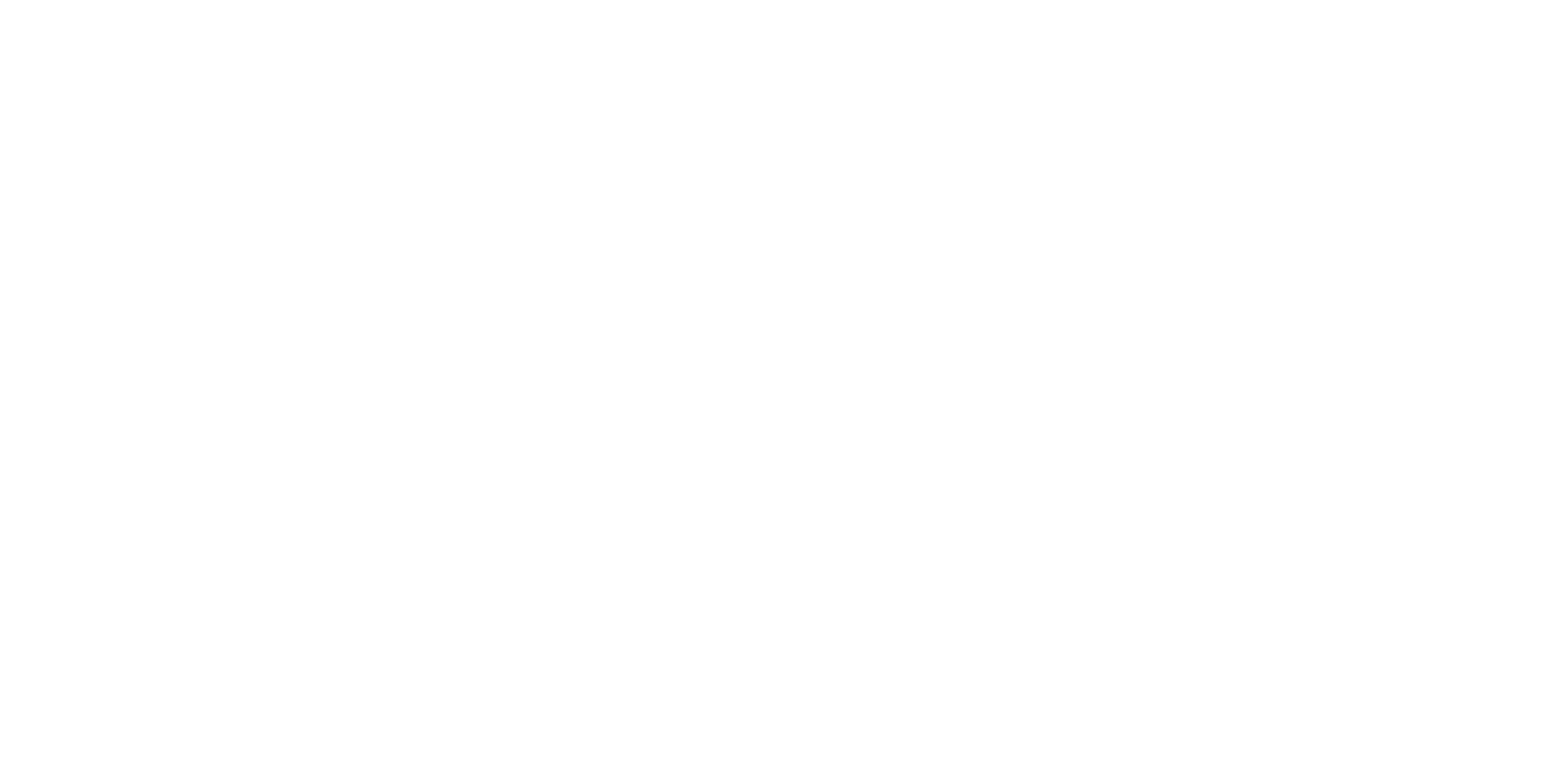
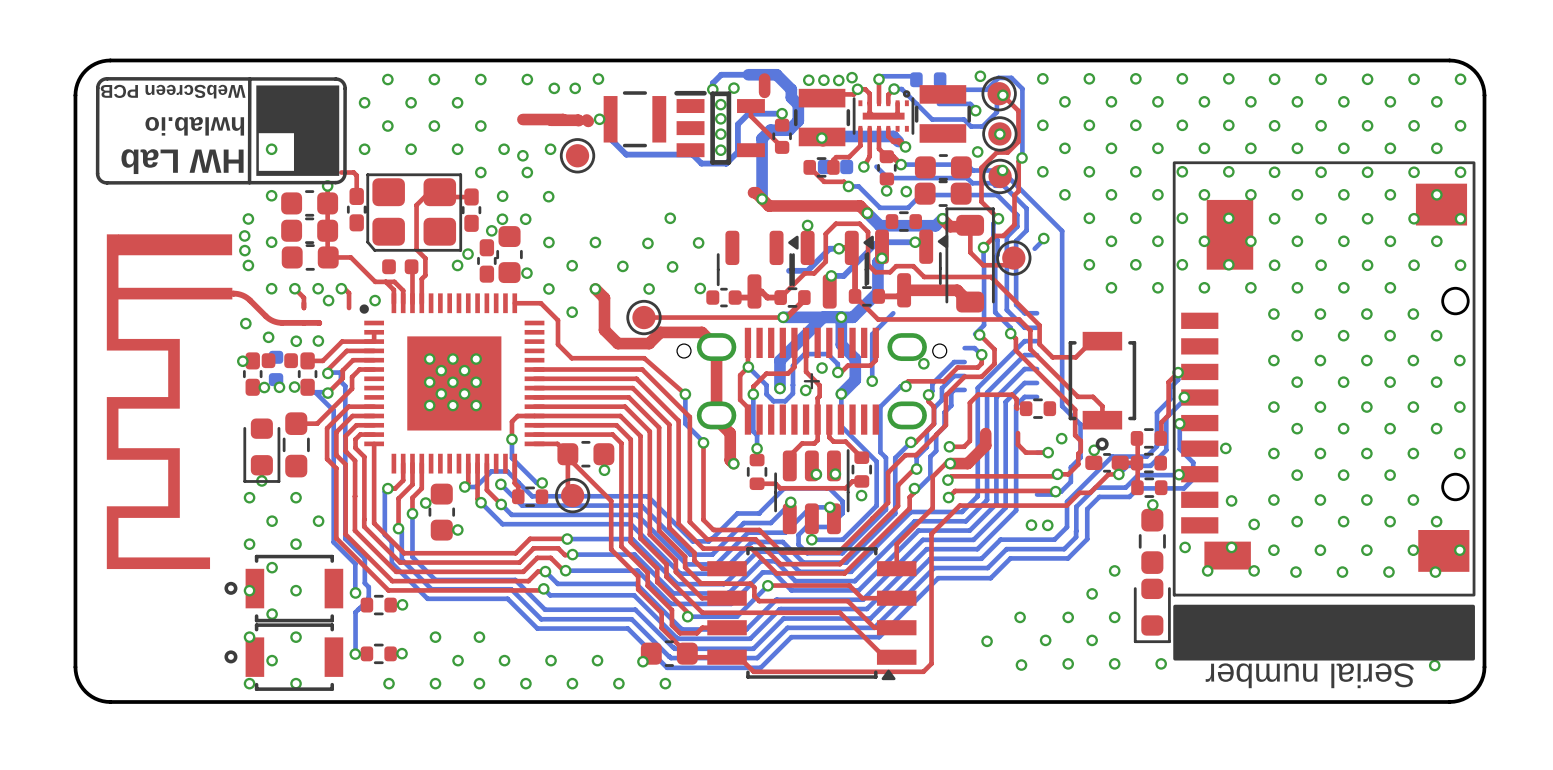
board edge: none -> (110, 60) (1449, 60) (1462, 63) (1470, 67) (1479, 77) (1484, 95) (1484, 667) (1481, 680) (1470, 694) (1458, 700) (1449, 702) (110, 702) (95, 698) (80, 685) (75, 667) (75, 95) (78, 80) (85, 70) (98, 62) (110, 60)
via: none -> (980, 76)
via: none -> (852, 77)
line: none -> (107, 78) (338, 79) (345, 87) (344, 177) (335, 182) (103, 182) (97, 174) (97, 88) (100, 81) (107, 78)
via: none -> (1042, 78)
via: none -> (1089, 78)
via: none -> (1135, 78)
via: none -> (1182, 78)
via: none -> (1228, 78)
line: none -> (249, 79) (249, 182)
via: none -> (387, 79)
via: none -> (434, 79)
via: none -> (480, 79)
via: none -> (527, 79)
via: none -> (598, 79)
top track: none -> (764, 79) (764, 92)
top track: none -> (878, 79) (878, 103)
bottom track: none -> (878, 79) (882, 76) (912, 76) (916, 79)
via: none -> (878, 79)
part: none -> (928, 79)
bottom track: none -> (940, 79) (940, 87) (942, 89) (986, 89) (998, 77) (1011, 77) (1022, 88) (1022, 157)
via: none -> (1274, 79)
via: none -> (1321, 79)
via: none -> (1367, 79)
via: none -> (1414, 79)
via: none -> (1460, 79)
via: none -> (808, 80)
via: none -> (823, 80)
via: none -> (838, 80)
drawing: none -> [256, 85, 340, 176]
via: none -> (554, 88)
via: none -> (575, 88)
via: none -> (733, 88)
bottom track: none -> (712, 89) (712, 83) (721, 74) (776, 74) (791, 89) (791, 97) (798, 104) (798, 120) (789, 130) (770, 130) (762, 138) (762, 199)
via: none -> (712, 89)
via: none -> (857, 89)
top track: none -> (894, 89) (888, 94) (888, 103)
bottom track: none -> (894, 89) (901, 89) (932, 119) (964, 119) (971, 126) (982, 126)
via: none -> (894, 89)
text: none -> WebScreen PCB (173, 91)
part: none -> (999, 93)
top track: none -> (822, 94) (853, 94) (857, 89) (865, 89) (869, 93) (869, 112) (873, 116)
top track: none -> (1002, 95) (1018, 110) (1018, 141) (1007, 152) (996, 152) (981, 167) (981, 201) (998, 218)
bottom track: none -> (1002, 95) (996, 103) (996, 112) (982, 126)
via: none -> (1002, 95)
via: none -> (1064, 101)
via: none -> (1111, 101)
via: none -> (1157, 101)
via: none -> (1204, 101)
via: none -> (1250, 101)
via: none -> (1297, 101)
via: none -> (1343, 101)
via: none -> (1390, 101)
via: none -> (1436, 101)
via: none -> (364, 102)
via: none -> (411, 102)
via: none -> (457, 102)
top track: none -> (897, 103) (897, 113) (894, 116)
bottom track: none -> (938, 103) (970, 103) (976, 110)
via: none -> (720, 104)
top track: none -> (753, 106) (750, 106) (750, 116) (782, 147)
via: none -> (975, 110)
part: none -> (883, 112)
bottom track: none -> (782, 113) (748, 113) (737, 124) (737, 152) (726, 163) (701, 163) (692, 154) (626, 154) (612, 140) (612, 126) (604, 119) (599, 119)
via: none -> (782, 113)
part: none -> (942, 113)
part: none -> (822, 117)
via: none -> (720, 118)
top track: none -> (522, 119) (563, 120)
top track: none -> (586, 119) (588, 121)
via: none -> (599, 119)
part: none -> (634, 119)
top track: none -> (551, 120) (578, 120)
text: none -> hwlab.io (194, 126)
via: none -> (1042, 125)
via: none -> (1089, 125)
via: none -> (1135, 125)
via: none -> (1182, 125)
via: none -> (1228, 125)
via: none -> (1274, 125)
via: none -> (1321, 125)
via: none -> (1367, 125)
via: none -> (1414, 125)
via: none -> (1460, 125)
via: none -> (387, 126)
via: none -> (434, 126)
via: none -> (480, 126)
part: none -> (719, 127)
top track: none -> (860, 128) (860, 145) (849, 157) (836, 157) (833, 159) (833, 167)
top track: none -> (869, 128) (869, 156) (863, 166)
top track: none -> (878, 128) (878, 148) (886, 156) (892, 156) (900, 164)
top track: none -> (888, 128) (888, 136) (893, 141)
part: none -> (999, 133)
via: none -> (720, 134)
via: none -> (999, 134)
part: none -> (782, 136)
bottom track: none -> (821, 138) (823, 136) (893, 136) (905, 146)
via: none -> (821, 138)
top track: none -> (893, 141) (898, 141) (904, 146) (905, 146) (899, 141) (893, 141)
via: none -> (905, 146)
via: none -> (1064, 148)
via: none -> (1111, 148)
via: none -> (1157, 148)
via: none -> (1204, 148)
via: none -> (1250, 148)
via: none -> (1297, 148)
via: none -> (1343, 148)
via: none -> (1390, 148)
via: none -> (1436, 148)
via: none -> (271, 149)
via: none -> (364, 149)
via: none -> (411, 149)
via: none -> (457, 149)
via: none -> (504, 149)
via: none -> (550, 149)
via: none -> (720, 150)
via: none -> (977, 151)
via: none -> (522, 155)
part: none -> (577, 155)
top track: none -> (1022, 157) (1018, 161) (1018, 191) (1014, 195) (1014, 224) (1003, 235) (994, 235) (983, 247)
via: none -> (1022, 157)
text: none -> HW Lab (182, 161)
bottom track: none -> (901, 164) (966, 164) (972, 170) (1002, 170) (1062, 231) (1062, 406) (1080, 424) (1080, 457) (1070, 467) (1070, 481) (1061, 491) (1055, 491)
via: none -> (901, 164)
part: none -> (835, 166)
via: none -> (863, 166)
bottom track: none -> (876, 166) (887, 178) (967, 178) (972, 183) (992, 183) (995, 185) (1003, 185) (1026, 208) (1026, 230) (1016, 240) (1016, 304) (1024, 313) (1037, 313)
top track: none -> (809, 167) (824, 181) (844, 181) (848, 186)
part: none -> (821, 167)
part: none -> (886, 167)
part: none -> (943, 167)
via: none -> (1002, 170)
via: none -> (1042, 171)
via: none -> (1089, 171)
via: none -> (1135, 171)
via: none -> (1182, 171)
via: none -> (1228, 171)
top track: none -> (341, 172) (353, 172) (356, 175) (356, 196)
via: none -> (480, 172)
via: none -> (527, 172)
via: none -> (1274, 172)
via: none -> (1321, 172)
via: none -> (1367, 172)
via: none -> (1414, 172)
via: none -> (1460, 172)
part: none -> (1000, 176)
top track: none -> (327, 185) (327, 256) (350, 257) (375, 281) (394, 281) (403, 290) (403, 303)
via: none -> (327, 185)
bottom track: none -> (848, 186) (858, 186) (880, 207) (908, 207) (920, 195) (997, 195) (1017, 215) (1017, 226) (1006, 237) (1006, 309) (1024, 327) (1037, 327)
via: none -> (848, 186)
via: none -> (886, 190)
via: none -> (906, 191)
top track: none -> (753, 192) (755, 192) (769, 205) (860, 205) (867, 213)
part: none -> (943, 193)
via: none -> (1064, 194)
via: none -> (1111, 194)
via: none -> (1157, 194)
via: none -> (1204, 194)
via: none -> (1250, 194)
via: none -> (1297, 194)
via: none -> (1343, 194)
via: none -> (1390, 194)
via: none -> (1436, 194)
via: none -> (271, 195)
via: none -> (502, 196)
via: none -> (548, 196)
top track: none -> (468, 197) (444, 197) (439, 192) (429, 192) (416, 205) (416, 249) (425, 258) (425, 275) (421, 278) (421, 303)
via: none -> (762, 199)
part: none -> (309, 203)
part: none -> (356, 209)
part: none -> (471, 210)
part: none -> (414, 212)
bottom track: none -> (867, 213) (879, 225) (935, 225) (942, 218)
via: none -> (867, 213)
via: none -> (670, 218)
via: none -> (942, 218)
bottom track: none -> (998, 218) (993, 223) (993, 236) (997, 240) (997, 254) (995, 257) (995, 312) (1010, 327) (1010, 333)
via: none -> (998, 218)
via: none -> (1089, 218)
via: none -> (1135, 218)
via: none -> (1182, 218)
via: none -> (1228, 218)
via: none -> (1274, 218)
via: none -> (1321, 218)
via: none -> (1367, 218)
via: none -> (1414, 218)
via: none -> (1460, 218)
via: none -> (248, 219)
via: none -> (502, 219)
via: none -> (525, 219)
top track: none -> (942, 219) (950, 226) (970, 226) (970, 252) (983, 265) (1006, 265) (1013, 258)
part: none -> (903, 221)
via: none -> (807, 225)
part: none -> (309, 230)
via: none -> (491, 230)
via: none -> (244, 235)
bottom track: none -> (1043, 238) (1034, 248)
via: none -> (1043, 238)
via: none -> (1111, 241)
via: none -> (1157, 241)
via: none -> (1204, 241)
via: none -> (1250, 241)
via: none -> (1297, 241)
via: none -> (1343, 241)
via: none -> (1390, 241)
via: none -> (1436, 241)
via: none -> (271, 242)
via: none -> (548, 242)
via: none -> (595, 242)
via: none -> (698, 242)
bottom track: none -> (915, 242) (875, 243) (843, 275) (831, 275)
via: none -> (915, 242)
via: none -> (647, 243)
bottom track: none -> (983, 247) (984, 325) (975, 334)
via: none -> (983, 247)
top track: none -> (839, 248) (851, 247) (855, 251) (855, 296) (878, 319) (1019, 319) (1030, 330) (1030, 349) (1078, 396) (1093, 396) (1102, 406) (1102, 420)
bottom track: none -> (839, 248) (829, 248) (807, 270) (789, 270)
via: none -> (839, 248)
via: none -> (244, 250)
via: none -> (468, 254)
part: none -> (509, 254)
part: none -> (310, 257)
bottom track: none -> (881, 258) (877, 262) (877, 292) (852, 317) (783, 317)
via: none -> (881, 258)
part: none -> (1013, 258)
part: none -> (970, 259)
part: none -> (486, 260)
via: none -> (1089, 264)
via: none -> (1135, 264)
via: none -> (1182, 264)
via: none -> (1228, 264)
via: none -> (248, 265)
via: none -> (457, 265)
via: none -> (572, 265)
via: none -> (1274, 265)
via: none -> (1321, 265)
via: none -> (1367, 265)
via: none -> (1414, 265)
via: none -> (1460, 265)
part: none -> (400, 266)
top track: none -> (411, 266) (412, 303)
via: none -> (622, 266)
via: none -> (672, 266)
part: none -> (907, 268)
part: none -> (757, 269)
part: none -> (832, 269)
via: none -> (526, 273)
via: none -> (831, 275)
top track: none -> (385, 281) (393, 290) (393, 303)
via: none -> (1111, 287)
via: none -> (1157, 287)
via: none -> (1204, 287)
via: none -> (1250, 287)
via: none -> (1297, 287)
via: none -> (1343, 287)
via: none -> (1390, 287)
via: none -> (271, 288)
top track: none -> (294, 288) (303, 297) (303, 308)
via: none -> (294, 288)
via: none -> (318, 288)
top track: none -> (341, 288) (344, 288) (349, 293) (349, 308)
via: none -> (341, 288)
via: none -> (548, 288)
top track: none -> (595, 288) (604, 298) (604, 330) (617, 343) (649, 343) (660, 332) (701, 332) (716, 347) (716, 419) (730, 433) (730, 460) (733, 463)
via: none -> (595, 288)
via: none -> (649, 288)
via: none -> (700, 288)
top track: none -> (171, 293) (238, 294) (248, 298) (267, 317) (275, 321) (319, 322)
part: none -> (866, 296)
top track: none -> (878, 296) (897, 296) (904, 290) (957, 290) (970, 303)
part: none -> (723, 297)
top track: none -> (737, 297) (755, 297) (761, 291) (767, 297) (782, 297)
top track: none -> (780, 297) (804, 273) (814, 273) (825, 261) (825, 233) (835, 223) (859, 223) (868, 232) (868, 264) (875, 272) (890, 272) (896, 266) (913, 266) (924, 276) (991, 276) (1039, 325) (1039, 344) (1052, 357) (1075, 357) (1091, 341) (1102, 341)
part: none -> (792, 297)
top track: none -> (806, 297) (786, 317) (782, 316)
via: none -> (328, 300)
via: none -> (375, 300)
top track: none -> (514, 303) (540, 303) (557, 320) (557, 344) (571, 358) (644, 358) (685, 394)
via: none -> (572, 312)
bottom track: none -> (893, 313) (872, 334) (872, 381)
via: none -> (1273, 314)
via: none -> (1320, 314)
via: none -> (1366, 314)
via: none -> (1413, 314)
top track: none -> (644, 317) (782, 317)
part: none -> (644, 317)
via: none -> (783, 317)
bottom track: none -> (823, 317) (779, 360) (779, 388)
bottom track: none -> (841, 317) (841, 344) (855, 358) (855, 380) (841, 394) (841, 426) (876, 461) (876, 505) (842, 539) (811, 539)
via: none -> (841, 317)
via: none -> (245, 323)
top track: none -> (374, 332) (374, 341) (342, 341) (322, 360) (307, 360)
top track: none -> (1010, 333) (1015, 338) (1015, 350) (1075, 409) (1075, 435) (1080, 440) (1078, 464) (1068, 474) (1057, 474) (1055, 476) (951, 476) (947, 480)
via: none -> (1010, 333)
via: none -> (979, 334)
top track: none -> (980, 334) (994, 349) (994, 363) (981, 376) (964, 376) (945, 395) (945, 425) (916, 455) (905, 455) (888, 472) (888, 502) (838, 552) (782, 552) (759, 530) (713, 530) (703, 520) (703, 442)
via: none -> (1297, 335)
via: none -> (1343, 335)
via: none -> (1390, 335)
via: none -> (1436, 335)
via: none -> (268, 337)
via: none -> (296, 341)
via: none -> (318, 341)
bottom track: none -> (1037, 341) (1024, 341) (977, 387) (977, 496) (962, 511) (910, 511) (851, 571) (799, 571) (779, 551) (757, 551) (723, 584) (677, 584) (632, 539) (567, 539)
top track: none -> (747, 342) (748, 367) (740, 375) (740, 399) (747, 407) (747, 419)
top track: none -> (794, 342) (794, 367) (787, 373) (766, 373) (753, 386) (753, 394)
top track: none -> (806, 342) (806, 371) (819, 385) (819, 396) (817, 398) (817, 440) (814, 443) (802, 443) (788, 456) (788, 465)
top track: none -> (875, 342) (875, 360) (870, 365) (847, 365) (841, 372) (837, 372)
bottom track: none -> (964, 348) (974, 348) (981, 355)
top track: none -> (374, 350) (346, 350) (327, 369) (327, 373) (329, 370)
top track: none -> (981, 354) (981, 363) (977, 367) (957, 367) (943, 381) (908, 381) (905, 386)
via: none -> (981, 354)
bottom track: none -> (1037, 355) (1024, 355) (987, 392) (987, 500) (965, 521) (914, 521) (854, 581) (795, 581) (775, 561) (760, 561) (727, 593) (673, 593) (634, 554) (572, 554)
via: none -> (429, 359)
via: none -> (452, 359)
via: none -> (476, 359)
part: none -> (279, 360)
top track: none -> (374, 360) (353, 360) (342, 370) (342, 378) (327, 393)
via: none -> (1273, 360)
via: none -> (1320, 360)
via: none -> (1366, 360)
via: none -> (1413, 360)
via: none -> (1459, 360)
via: none -> (242, 361)
bottom track: none -> (964, 362) (954, 362) (932, 383) (932, 391) (928, 394)
via: none -> (923, 363)
bottom track: none -> (748, 367) (766, 385) (766, 394) (773, 401) (785, 401) (792, 393) (792, 365) (804, 354) (827, 354) (837, 364) (837, 372)
via: none -> (748, 367)
part: none -> (276, 368)
via: none -> (822, 368)
top track: none -> (374, 369) (359, 369) (352, 377) (352, 388) (317, 423) (296, 423)
top track: none -> (534, 369) (642, 369) (689, 417) (689, 521) (707, 539) (755, 539) (780, 564) (839, 564) (898, 506) (898, 485) (914, 469) (916, 469)
bottom track: none -> (1037, 369) (1024, 369) (996, 397) (996, 503) (969, 530) (918, 530) (858, 590) (791, 590) (773, 572) (762, 572) (731, 603) (670, 603) (637, 570) (565, 570)
via: none -> (441, 370)
via: none -> (464, 370)
via: none -> (837, 372)
top track: none -> (1178, 372) (1168, 382) (1168, 415) (1161, 422) (1161, 438)
bottom track: none -> (1178, 372) (1178, 379) (1170, 387) (1170, 399) (1156, 412) (1156, 446) (1146, 456) (1112, 456) (1067, 501) (1067, 527) (1054, 539) (1000, 539) (981, 558) (930, 558) (870, 618) (783, 618) (753, 648) (673, 647)
via: none -> (1178, 372)
bottom track: none -> (327, 373) (340, 372) (340, 381) (345, 386) (345, 538) (364, 558) (364, 583) (368, 587) (368, 599) (359, 609)
via: none -> (327, 373)
part: none -> (252, 374)
part: none -> (307, 374)
bottom track: none -> (964, 376) (954, 376) (941, 388) (941, 400) (934, 408) (934, 423) (926, 431) (926, 447) (916, 457) (916, 469)
top track: none -> (534, 378) (636, 378) (678, 420) (678, 523) (703, 548) (751, 548) (776, 573) (844, 573) (909, 508) (909, 497) (914, 492) (914, 488)
part: none -> (1324, 378)
part: none -> (811, 381)
via: none -> (872, 381)
via: none -> (429, 382)
via: none -> (452, 382)
via: none -> (476, 382)
bottom track: none -> (1037, 382) (1024, 382) (1005, 401) (1005, 507) (973, 539) (922, 539) (863, 599) (777, 599)
via: none -> (1297, 382)
via: none -> (1343, 382)
via: none -> (1390, 382)
via: none -> (1436, 382)
part: none -> (452, 383)
bottom track: none -> (905, 386) (900, 386) (880, 406) (880, 452) (885, 457) (885, 509) (842, 553) (807, 553) (798, 544) (798, 534) (806, 526) (829, 526) (842, 513) (842, 502)
via: none -> (905, 386)
via: none -> (264, 387)
via: none -> (279, 387)
via: none -> (294, 387)
top track: none -> (534, 388) (632, 388) (669, 424) (669, 527) (694, 552) (694, 560) (702, 568) (727, 568)
via: none -> (779, 388)
bottom track: none -> (964, 389) (954, 389) (951, 392) (951, 405) (944, 412) (944, 426) (936, 434) (936, 450) (930, 456) (930, 476) (917, 489)
via: none -> (805, 390)
part: none -> (1102, 391)
bottom track: none -> (327, 393) (315, 392) (333, 410) (333, 542) (355, 563) (355, 592)
via: none -> (327, 393)
via: none -> (441, 393)
via: none -> (464, 393)
bottom track: none -> (685, 394) (685, 423) (703, 441)
via: none -> (685, 394)
bottom track: none -> (753, 394) (753, 431) (757, 435) (757, 448)
via: none -> (753, 394)
via: none -> (841, 394)
top track: none -> (928, 394) (928, 401) (933, 406) (933, 424) (915, 442) (910, 442)
via: none -> (928, 394)
bottom track: none -> (1037, 396) (1024, 396) (1016, 405) (1016, 510) (977, 549) (926, 549) (866, 609) (781, 609)
top track: none -> (534, 397) (628, 397) (659, 427) (659, 530) (685, 556) (685, 567) (701, 583)
bottom track: none -> (1184, 397) (1184, 399) (1166, 417) (1166, 450) (1150, 465) (1127, 465) (1118, 474)
via: none -> (1184, 397)
part: none -> (169, 401)
via: none -> (429, 405)
via: none -> (452, 405)
via: none -> (476, 405)
top track: none -> (374, 406) (348, 406) (327, 428) (327, 459) (336, 468) (336, 538) (388, 590) (543, 589)
top track: none -> (534, 406) (625, 406) (649, 431) (649, 534) (675, 560) (675, 571) (702, 598) (727, 598)
via: none -> (1273, 407)
via: none -> (1320, 407)
via: none -> (1366, 407)
via: none -> (1413, 407)
via: none -> (1459, 407)
top track: none -> (1017, 408) (1016, 399) (1012, 394) (978, 394) (969, 402) (969, 440) (964, 446) (949, 446)
part: none -> (1037, 408)
top track: none -> (374, 415) (352, 415) (336, 432) (336, 455) (345, 464) (345, 534) (392, 581) (528, 581) (538, 571) (545, 571)
top track: none -> (829, 419) (829, 437) (833, 441) (845, 441) (861, 457)
bottom track: none -> (1179, 423) (1179, 449) (1193, 462) (1193, 479) (1183, 488) (1138, 488) (1129, 496) (1099, 496) (1087, 509) (1087, 539) (1068, 558) (1010, 558) (990, 578) (938, 578) (879, 637) (791, 637) (760, 667) (667, 667) (627, 628) (537, 628) (507, 598) (427, 598) (391, 563) (391, 541) (384, 534) (384, 491) (387, 488)
via: none -> (1179, 423)
top track: none -> (374, 425) (356, 425) (345, 436) (345, 451) (355, 460) (355, 496)
top track: none -> (534, 425) (616, 425) (630, 439) (630, 542) (657, 568) (657, 582) (688, 613) (688, 619) (687, 616)
via: none -> (1297, 428)
via: none -> (1343, 428)
via: none -> (1390, 428)
via: none -> (1436, 428)
top track: none -> (985, 433) (985, 445) (967, 463) (945, 463) (932, 476) (932, 508) (896, 544) (896, 568)
top track: none -> (1017, 433) (1017, 444) (1025, 452) (1048, 452)
top track: none -> (374, 434) (360, 434) (355, 439) (355, 448) (364, 456) (364, 519)
top track: none -> (534, 434) (612, 434) (621, 443) (621, 546) (647, 572) (647, 585) (671, 610) (671, 625) (679, 633) (696, 633) (702, 627) (727, 627)
via: none -> (1061, 438)
top track: none -> (1137, 438) (1137, 485)
part: none -> (1148, 438)
top track: none -> (511, 439) (511, 421) (517, 415) (620, 415) (640, 436) (640, 538) (666, 564) (666, 576) (702, 612) (839, 612) (884, 657) (896, 657) (888, 657)
bottom track: none -> (511, 439) (511, 458) (536, 483) (542, 483)
via: none -> (511, 439)
via: none -> (703, 442)
bottom track: none -> (910, 442) (895, 457) (895, 513) (846, 562) (803, 562) (782, 541) (751, 541) (720, 573) (680, 573) (630, 524) (502, 524) (481, 502)
via: none -> (910, 442)
top track: none -> (374, 443) (374, 523) (404, 553) (515, 553) (530, 538) (567, 538)
top track: none -> (534, 443) (557, 443) (567, 454) (568, 495)
part: none -> (296, 444)
via: none -> (949, 446)
via: none -> (757, 448)
via: none -> (1225, 448)
part: none -> (261, 450)
via: none -> (1094, 450)
via: none -> (1048, 452)
via: none -> (1273, 453)
via: none -> (1320, 453)
via: none -> (1366, 453)
via: none -> (1413, 453)
via: none -> (1459, 453)
part: none -> (585, 454)
top track: none -> (567, 457) (611, 500) (611, 549) (638, 576) (638, 589) (661, 612) (661, 628) (690, 657) (739, 657) (753, 671) (923, 671) (931, 663) (931, 533) (959, 505) (1066, 505) (1079, 492) (1090, 492) (1108, 474) (1118, 474) (1120, 462) (1139, 462)
part: none -> (1107, 462)
top track: none -> (403, 463) (403, 480) (395, 488) (387, 488)
top track: none -> (412, 463) (412, 484) (398, 498) (398, 528)
top track: none -> (421, 463) (421, 488) (412, 497) (412, 513)
top track: none -> (468, 463) (468, 483) (464, 487)
top track: none -> (477, 463) (477, 499) (481, 502)
top track: none -> (486, 463) (486, 490) (501, 504)
top track: none -> (514, 463) (514, 483) (518, 486) (518, 496)
via: none -> (733, 463)
via: none -> (950, 463)
part: none -> (1148, 463)
part: none -> (861, 469)
via: none -> (916, 469)
via: none -> (604, 470)
part: none -> (757, 471)
via: none -> (816, 474)
via: none -> (835, 474)
via: none -> (1057, 474)
via: none -> (1118, 474)
bottom track: none -> (1178, 474) (1138, 475) (1125, 487) (1095, 487) (1076, 506) (1076, 531)
via: none -> (1179, 474)
via: none -> (1297, 475)
via: none -> (1343, 475)
via: none -> (1390, 475)
via: none -> (261, 480)
via: none -> (947, 480)
top track: none -> (861, 481) (852, 481) (845, 488) (780, 488) (775, 483) (757, 483)
via: none -> (542, 483)
bottom track: none -> (500, 484) (522, 505) (641, 505) (690, 554) (712, 554) (743, 523) (770, 523) (790, 502)
via: none -> (500, 484)
bottom track: none -> (464, 487) (475, 487) (491, 471) (507, 471) (532, 496) (647, 496) (692, 541) (708, 541) (737, 513) (759, 513)
via: none -> (464, 487)
part: none -> (1149, 487)
via: none -> (387, 488)
via: none -> (914, 488)
part: none -> (811, 491)
top track: none -> (1055, 491) (955, 490) (948, 497)
bottom track: none -> (1055, 491) (1052, 494) (1037, 494)
via: none -> (1055, 491)
part: none -> (572, 495)
via: none -> (861, 495)
top track: none -> (354, 496) (354, 530) (396, 571) (523, 571) (537, 557) (550, 557) (565, 572) (564, 571)
part: none -> (530, 496)
via: none -> (249, 497)
via: none -> (296, 497)
via: none -> (948, 497)
via: none -> (1231, 500)
via: none -> (1273, 500)
via: none -> (1320, 500)
via: none -> (1366, 500)
via: none -> (1413, 500)
bottom track: none -> (842, 501) (829, 488) (784, 488) (759, 513)
via: none -> (481, 502)
via: none -> (790, 502)
via: none -> (425, 503)
bottom track: none -> (501, 504) (511, 514) (637, 514) (686, 564) (716, 564) (748, 532) (785, 532) (810, 507) (829, 507)
via: none -> (501, 504)
via: none -> (1152, 504)
via: none -> (829, 507)
part: none -> (441, 512)
bottom track: none -> (412, 513) (412, 557) (435, 579) (515, 579) (545, 609) (635, 609) (673, 647)
via: none -> (412, 513)
top track: none -> (364, 519) (364, 526) (400, 562) (519, 562) (533, 548) (558, 548) (564, 555) (572, 554)
via: none -> (272, 521)
via: none -> (318, 521)
via: none -> (1297, 521)
via: none -> (1343, 521)
via: none -> (1390, 521)
via: none -> (1436, 521)
via: none -> (1254, 524)
via: none -> (1031, 525)
via: none -> (1047, 525)
bottom track: none -> (398, 528) (401, 531) (401, 559) (431, 589) (511, 589) (541, 619) (631, 619) (669, 656)
via: none -> (398, 528)
via: none -> (457, 530)
bottom track: none -> (1076, 531) (1076, 537) (1064, 549) (1006, 549) (987, 568) (934, 568) (874, 627) (787, 627) (757, 658) (669, 656)
via: none -> (567, 539)
via: none -> (811, 539)
part: none -> (1152, 541)
via: none -> (249, 544)
via: none -> (296, 544)
via: none -> (1185, 547)
via: none -> (1231, 547)
via: none -> (1273, 550)
via: none -> (1320, 550)
via: none -> (1366, 550)
via: none -> (1413, 550)
via: none -> (1459, 550)
via: none -> (572, 554)
via: none -> (272, 567)
via: none -> (565, 570)
via: none -> (1114, 570)
via: none -> (1207, 570)
via: none -> (1254, 570)
bottom track: none -> (545, 571) (557, 583) (636, 583) (681, 629) (746, 629) (776, 599)
via: none -> (545, 571)
via: none -> (1295, 572)
via: none -> (1342, 572)
via: none -> (1388, 572)
via: none -> (1435, 572)
top track: none -> (700, 583) (750, 583) (754, 587) (754, 596) (759, 601) (847, 601) (874, 627) (896, 627)
bottom track: none -> (767, 585) (736, 616) (687, 616)
via: none -> (767, 585)
top track: none -> (769, 585) (767, 585) (849, 585) (862, 598) (896, 598)
part: none -> (283, 588)
bottom track: none -> (543, 588) (550, 595) (634, 595) (676, 638)
via: none -> (543, 588)
via: none -> (249, 590)
via: none -> (296, 590)
via: none -> (355, 592)
via: none -> (1092, 593)
via: none -> (402, 604)
drawing: none -> [1173, 604, 1475, 661]
part: none -> (378, 605)
bottom track: none -> (358, 609) (355, 612) (355, 653)
bottom track: none -> (780, 609) (750, 638) (677, 638)
part: none -> (1152, 610)
part: none -> (811, 613)
via: none -> (272, 614)
via: none -> (687, 616)
via: none -> (1020, 617)
via: none -> (1068, 617)
via: none -> (1114, 617)
via: none -> (249, 637)
via: none -> (296, 637)
via: none -> (435, 637)
via: none -> (479, 637)
via: none -> (1045, 640)
via: none -> (1092, 640)
via: none -> (987, 641)
part: none -> (378, 653)
via: none -> (402, 653)
part: none -> (669, 653)
via: none -> (355, 654)
part: none -> (283, 657)
via: none -> (272, 660)
via: none -> (458, 660)
via: none -> (504, 660)
via: none -> (551, 660)
via: none -> (597, 660)
via: none -> (642, 661)
via: none -> (1068, 663)
via: none -> (1114, 663)
via: none -> (1161, 663)
via: none -> (1021, 665)
via: none -> (1434, 665)
text: none -> Serial number (1309, 675)
via: none -> (249, 683)
via: none -> (296, 683)
via: none -> (389, 683)
via: none -> (435, 683)
via: none -> (479, 683)
via: none -> (525, 683)
via: none -> (572, 683)
via: none -> (618, 683)
via: none -> (665, 683)

